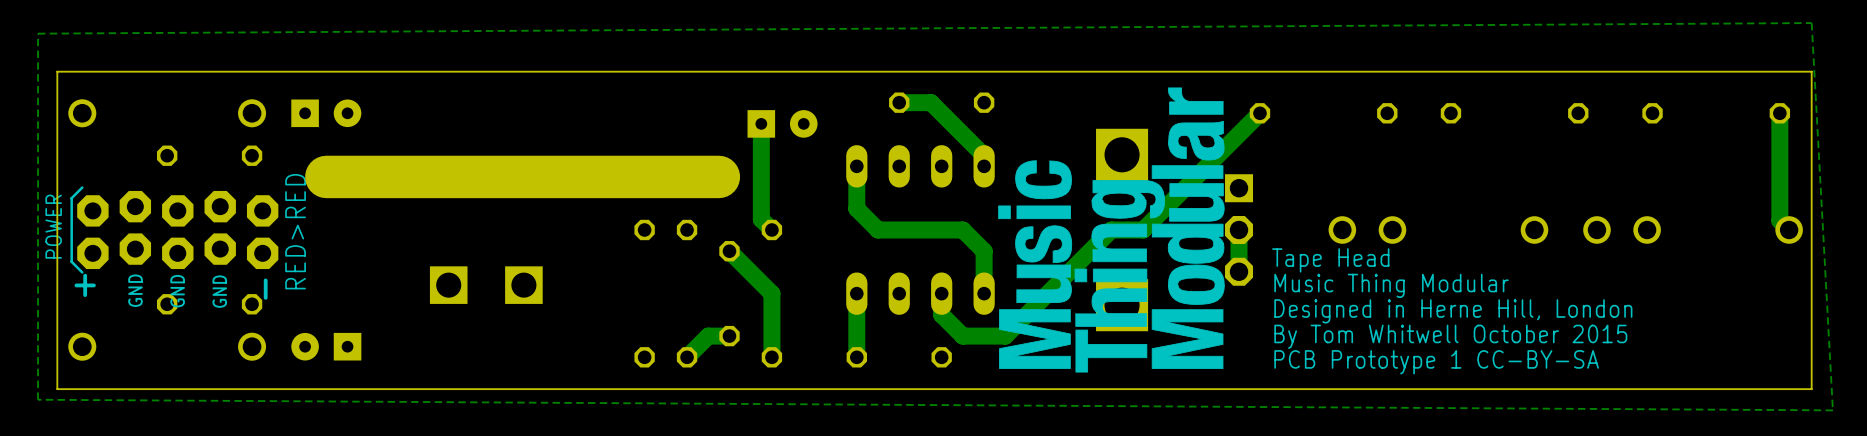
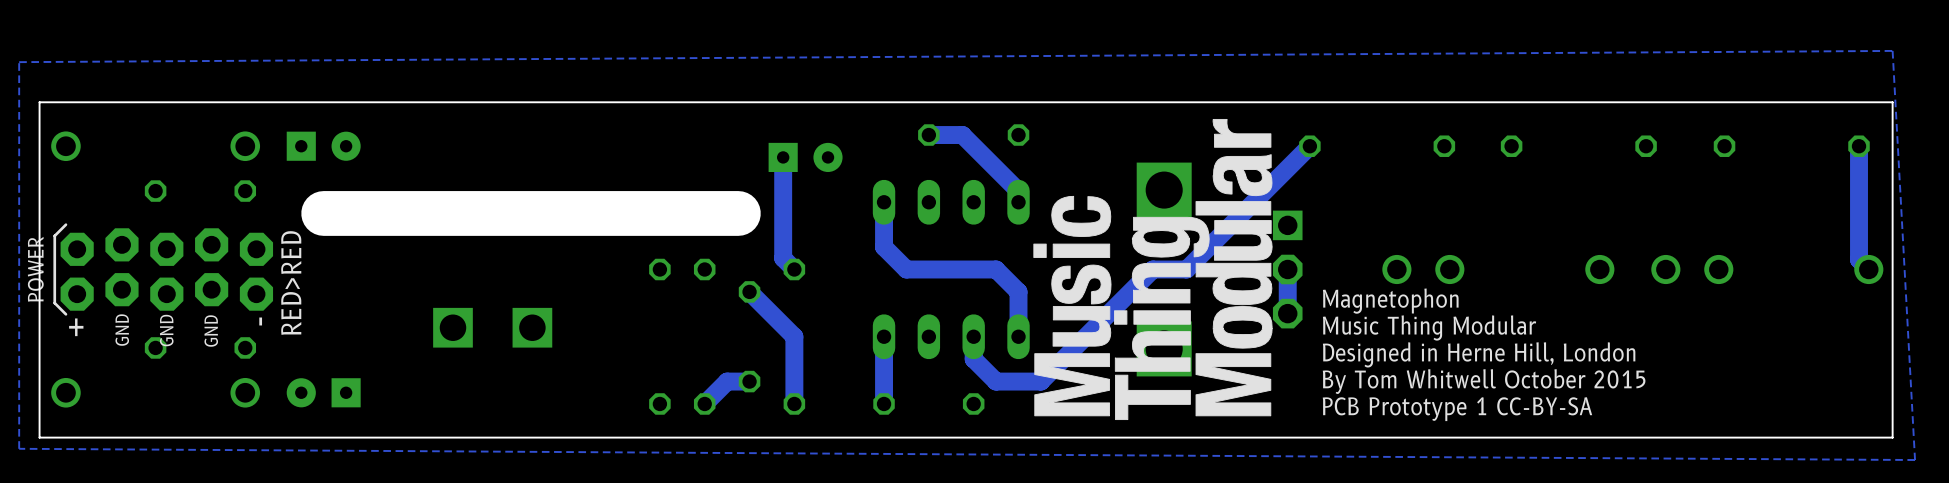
text: Tape Head (1330, 260) -> Magnetophon (1390, 301)

